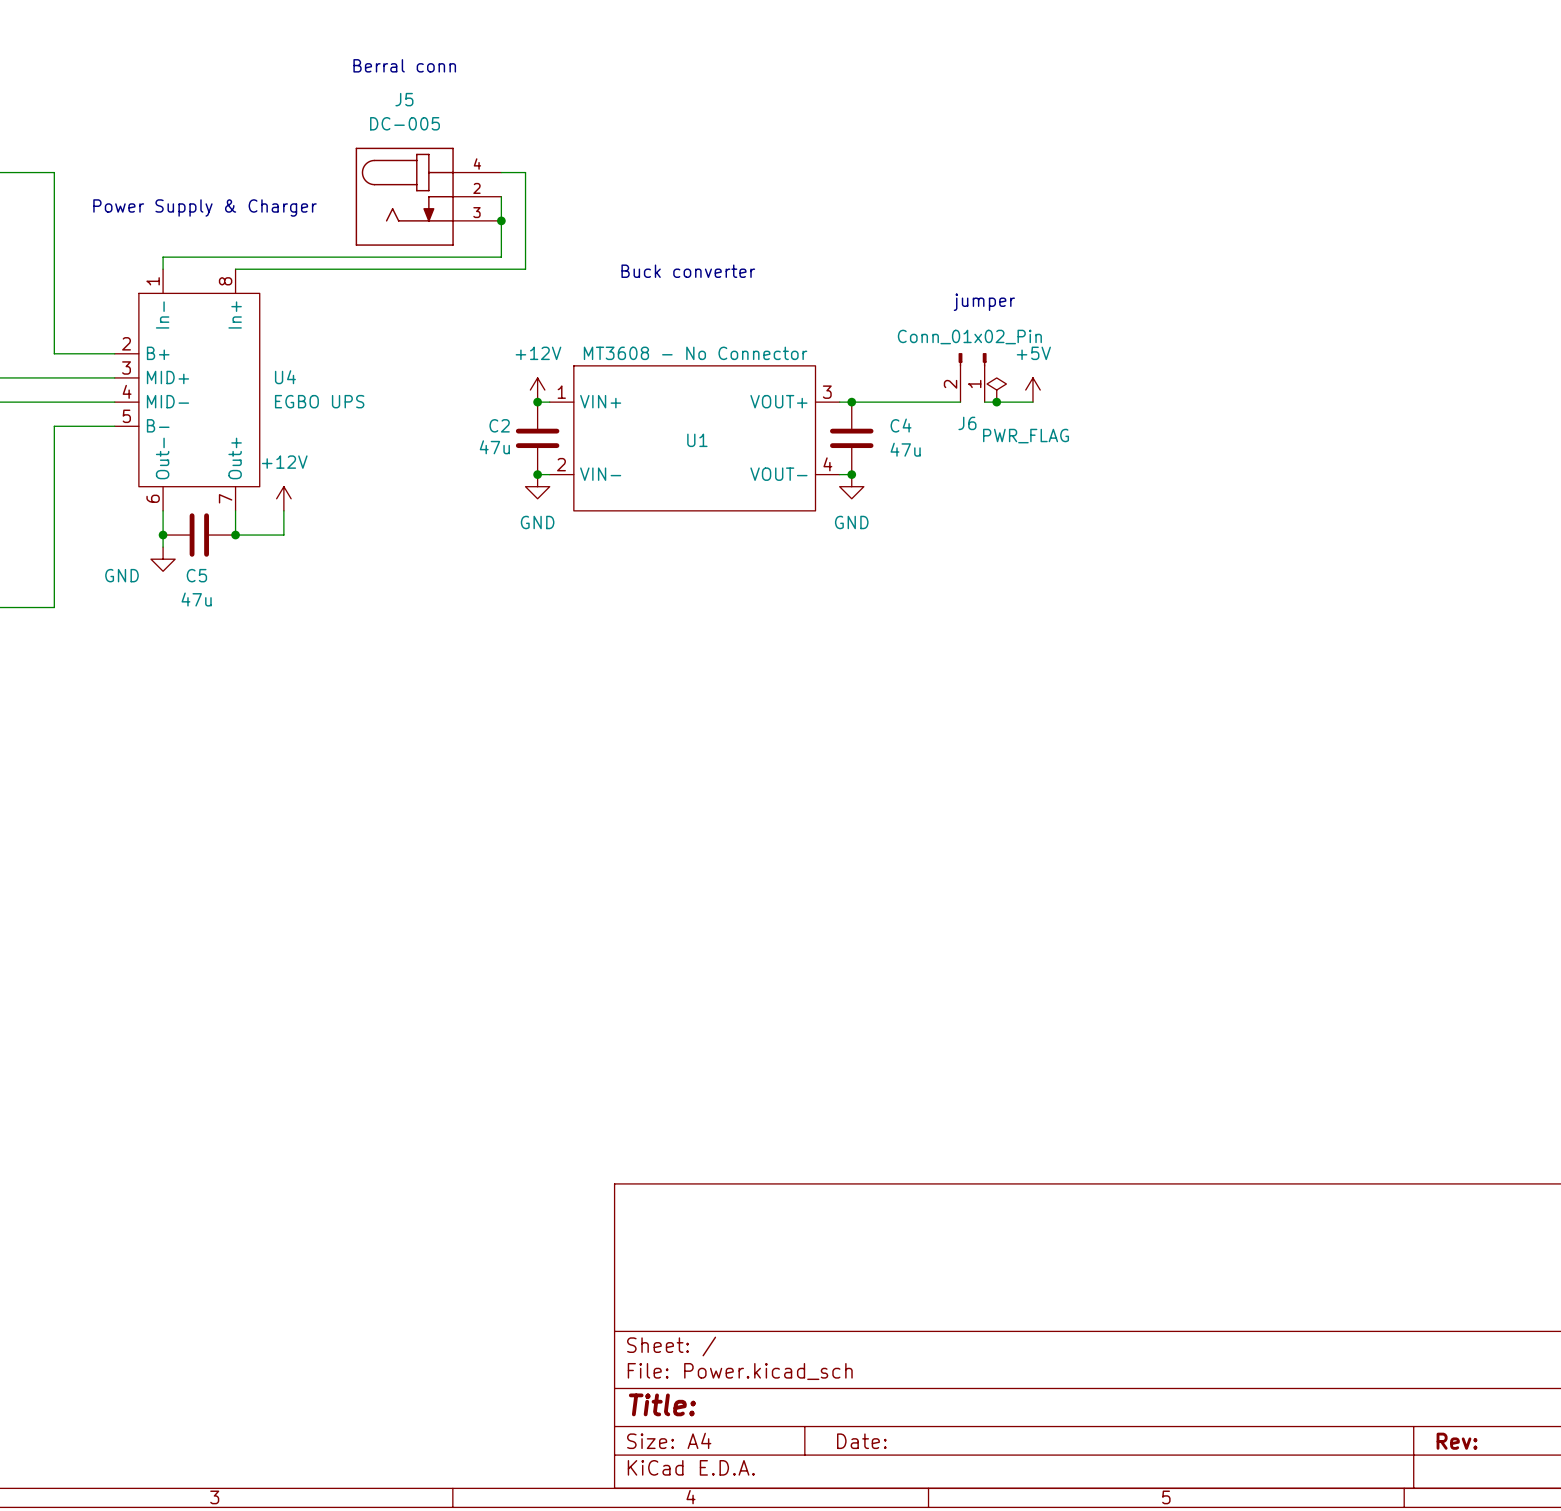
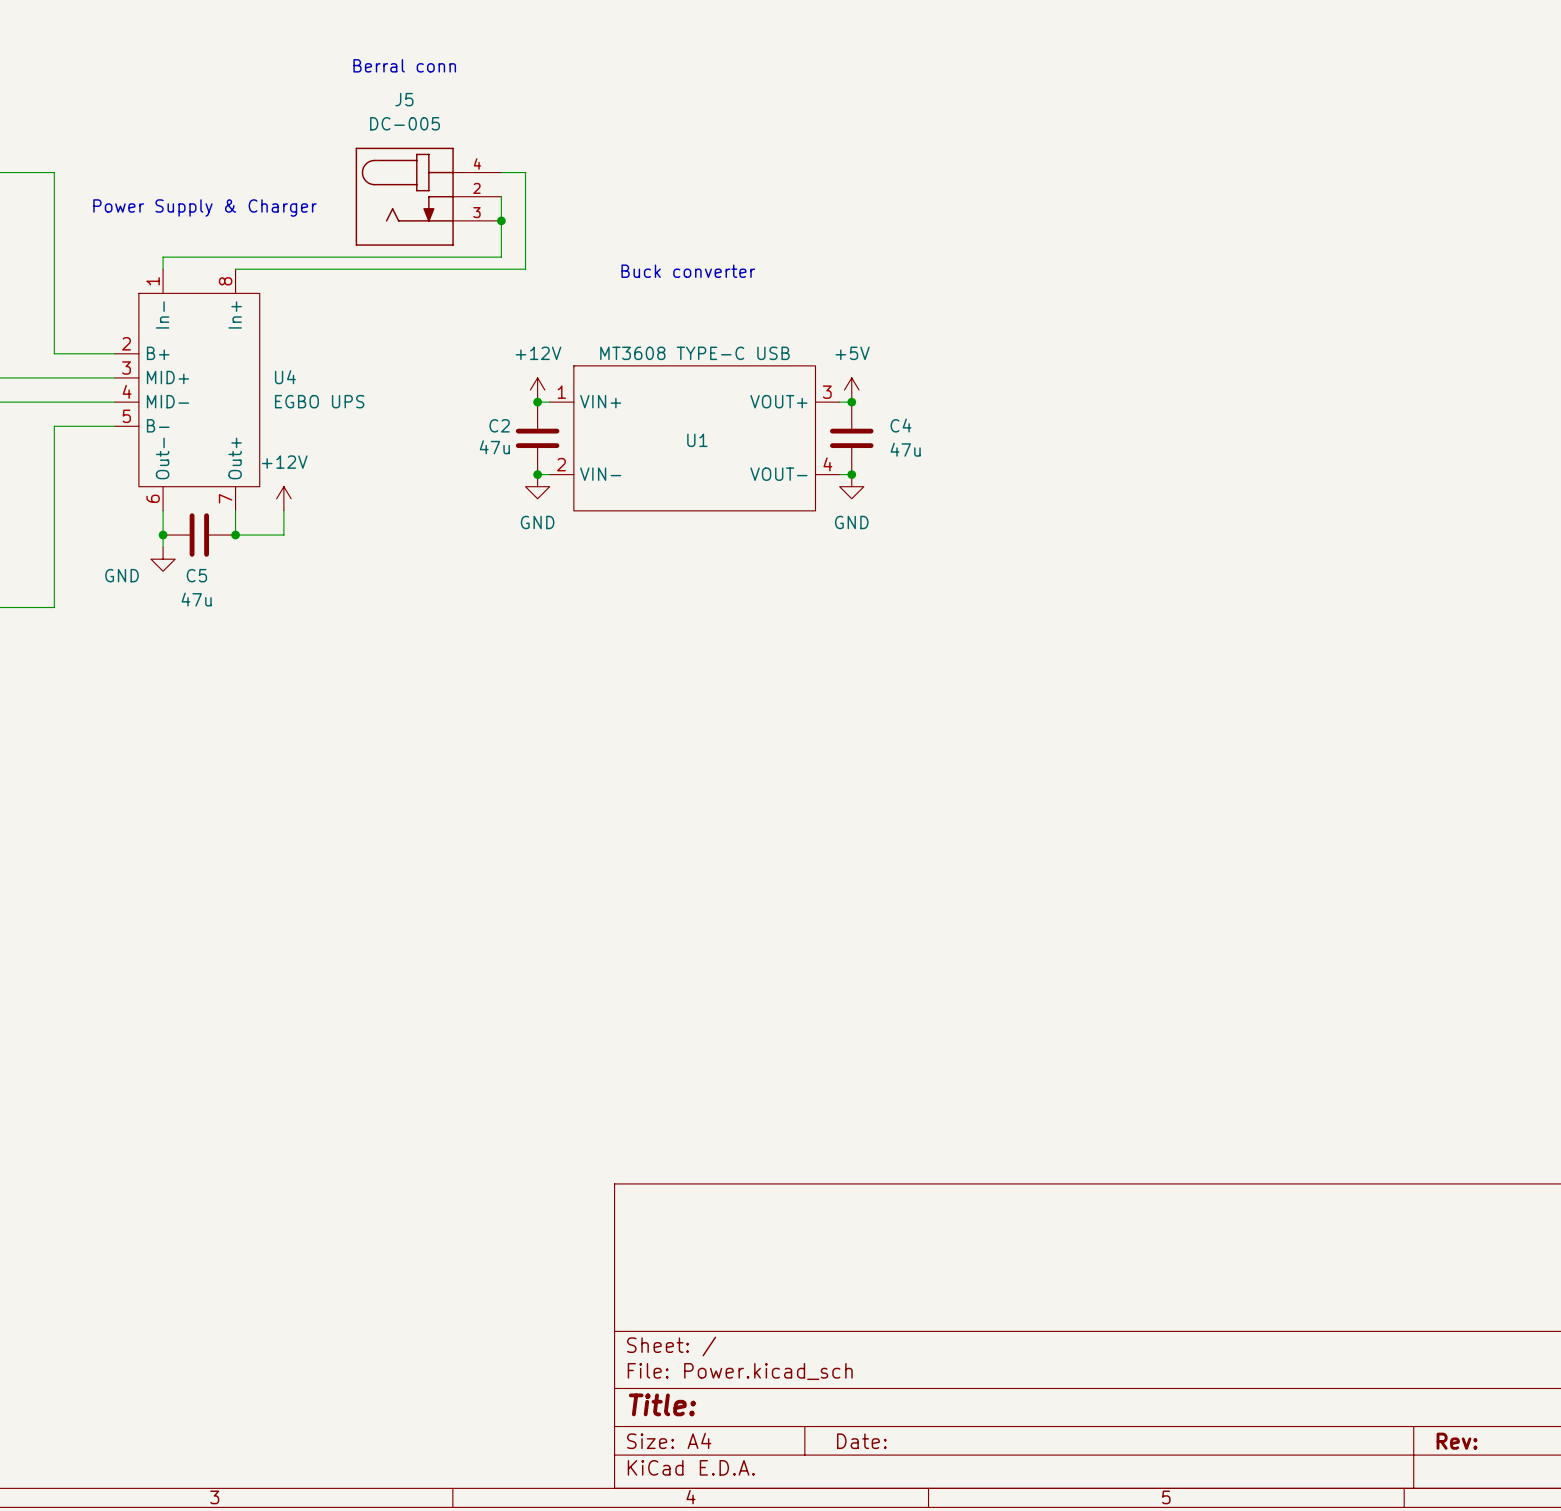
text: jumper (984, 302) -> none
U1 value: MT3608 - No Connector (695, 353) -> MT3608 TYPE-C USB (694, 353)
J6: Conn_01x02_Pin (972, 377) -> none
power symbol: PWR_FLAG (996, 390) -> none
power symbol position: +5V (1032, 390) -> +5V (851, 390)
wire: (851, 402) (960, 402) -> none
wire: (984, 402) (1032, 402) -> none
junction: (996, 402) -> none

